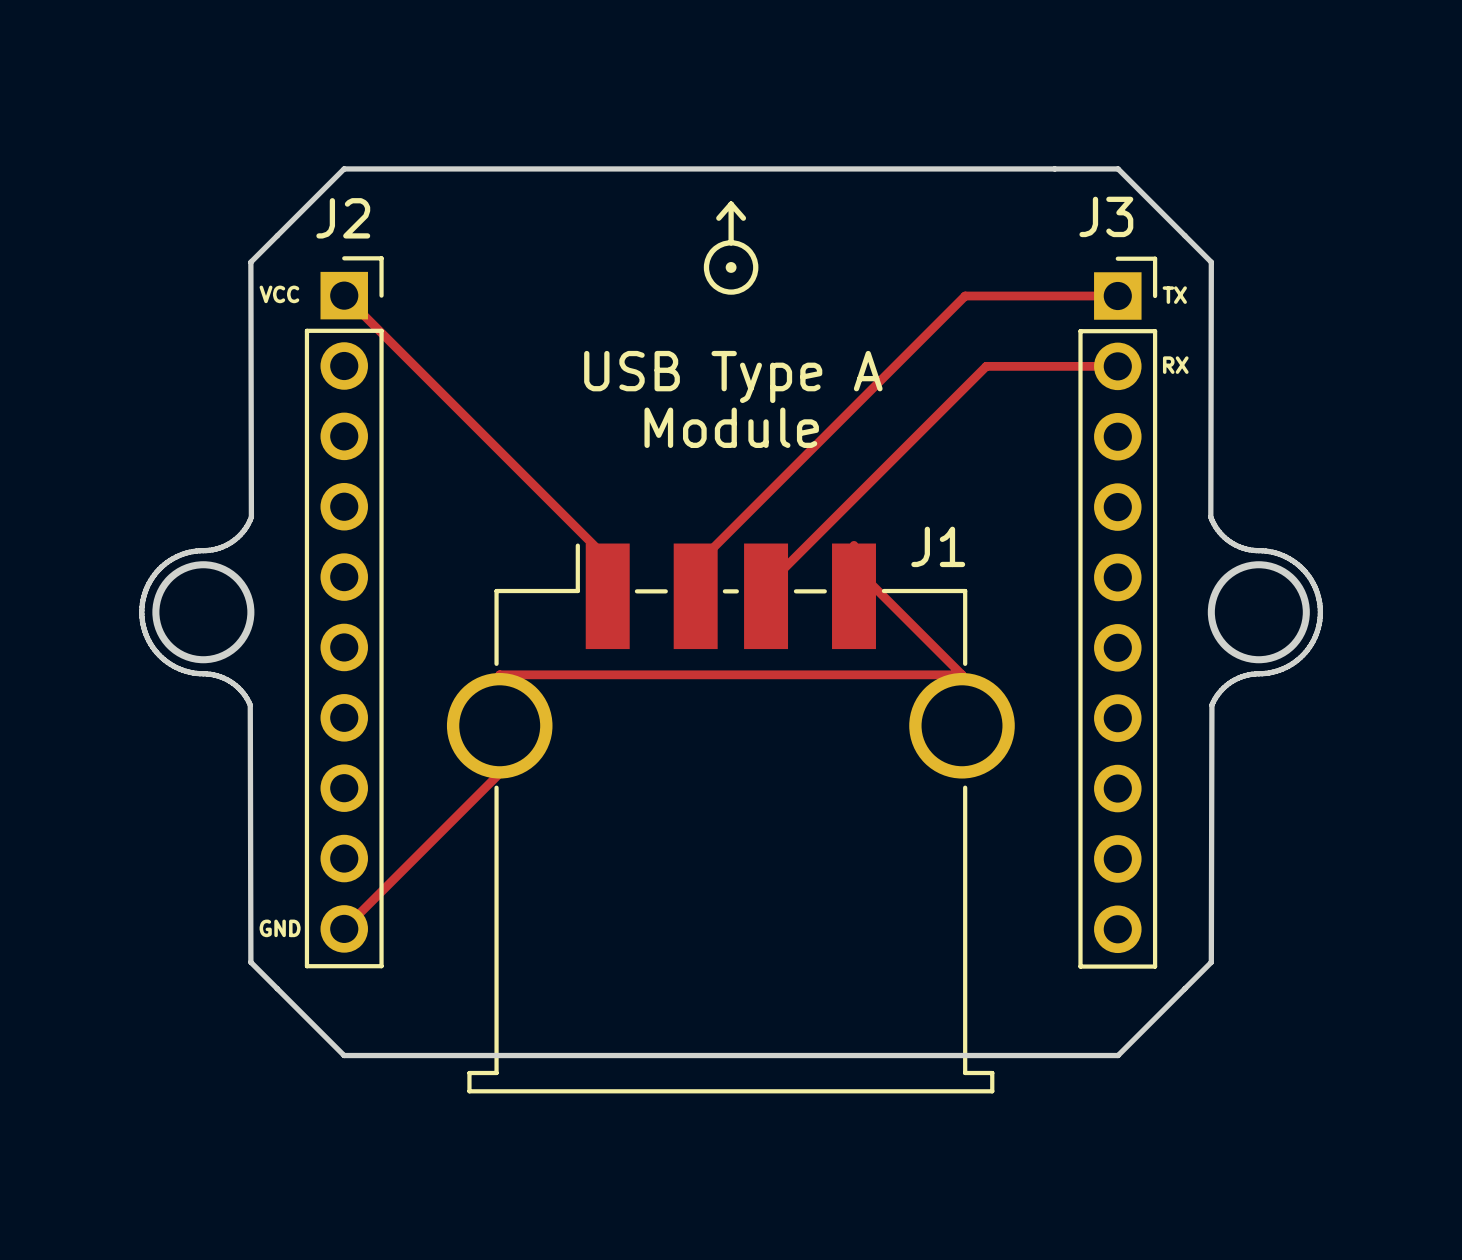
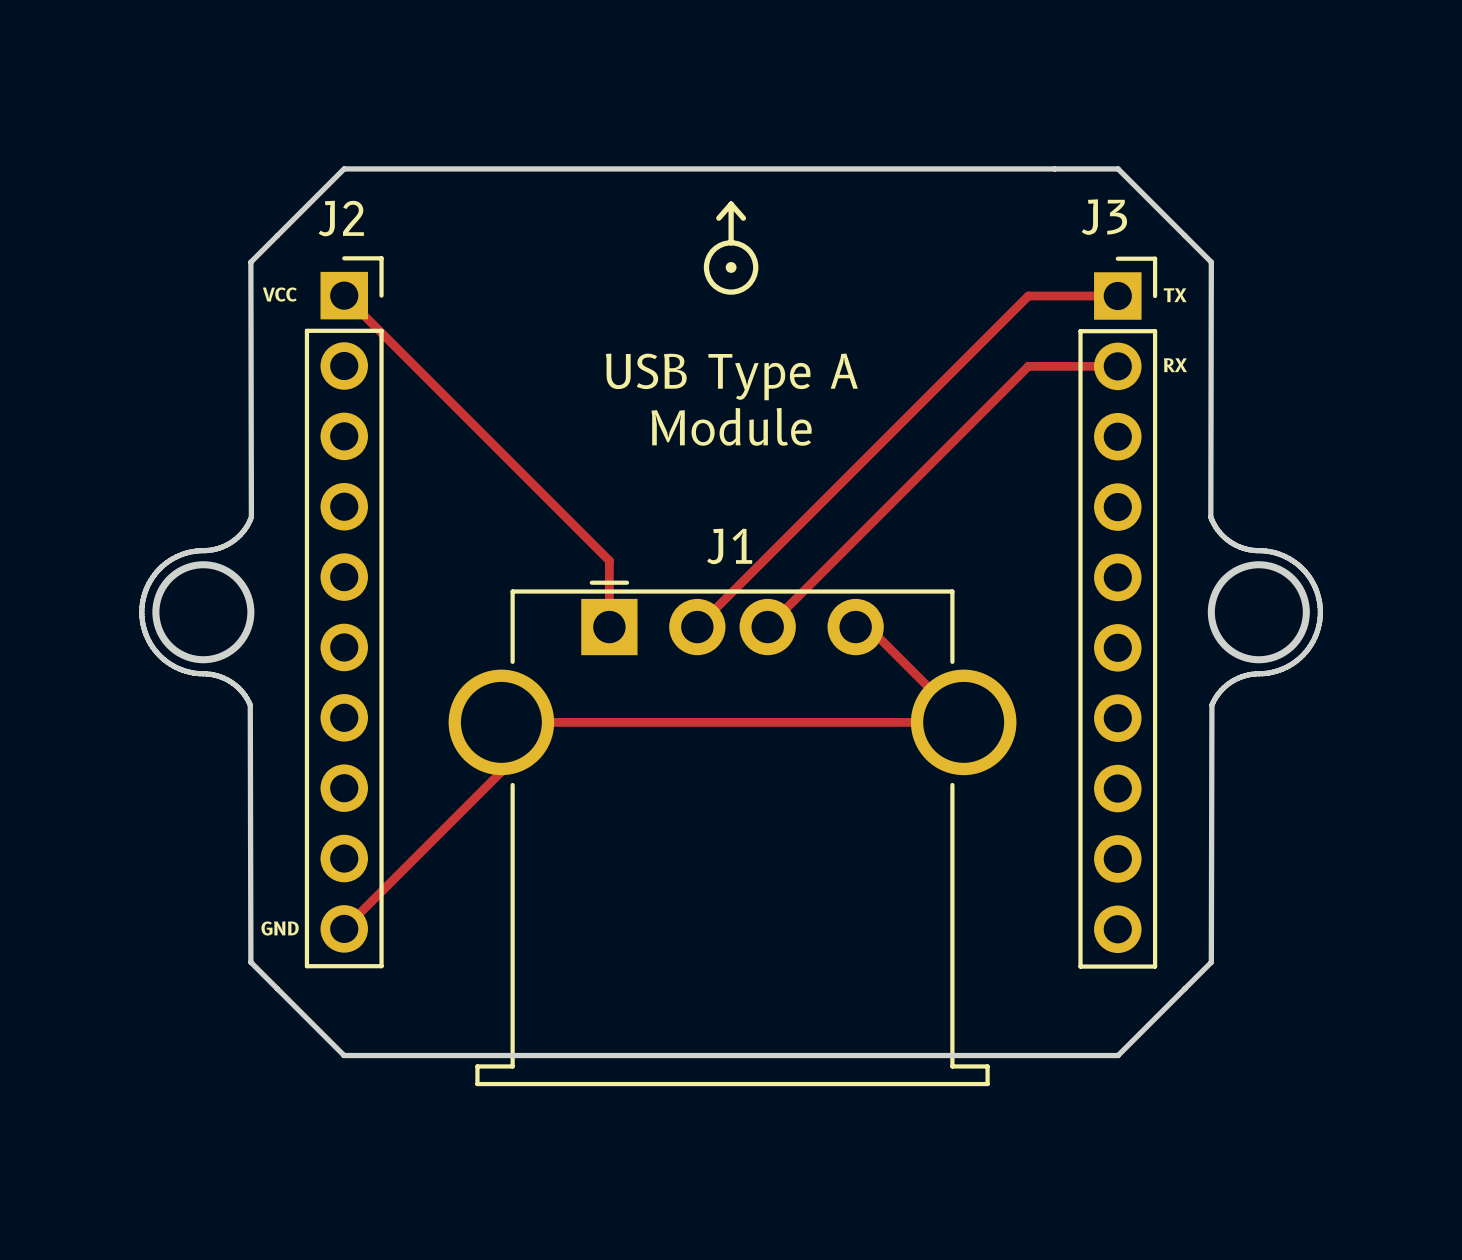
top track: (1028, 296) (965, 296) (695, 565) (695, 596) -> (1028, 296) (697, 627)
top track: (1028, 366) (986, 366) (766, 586) (766, 596) -> (1028, 366) (767, 627)
J1 footprint: [446, 543, 1015, 1094] -> [448, 580, 1017, 1087]
top track: (854, 545) (854, 566) (962, 674) (499, 674) (499, 773) -> (855, 627) (868, 627) (963, 722) (501, 722) (501, 771) (499, 773)
J1 name position: J1 (938, 546) -> J1 (729, 546)
top track: none -> (607, 559) (609, 560) (609, 627)

